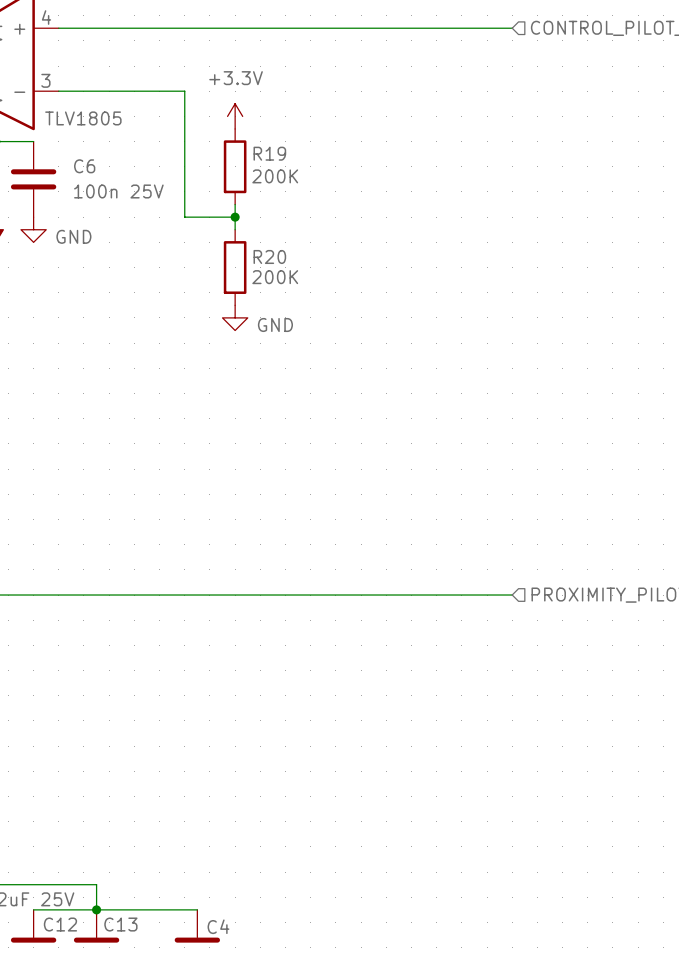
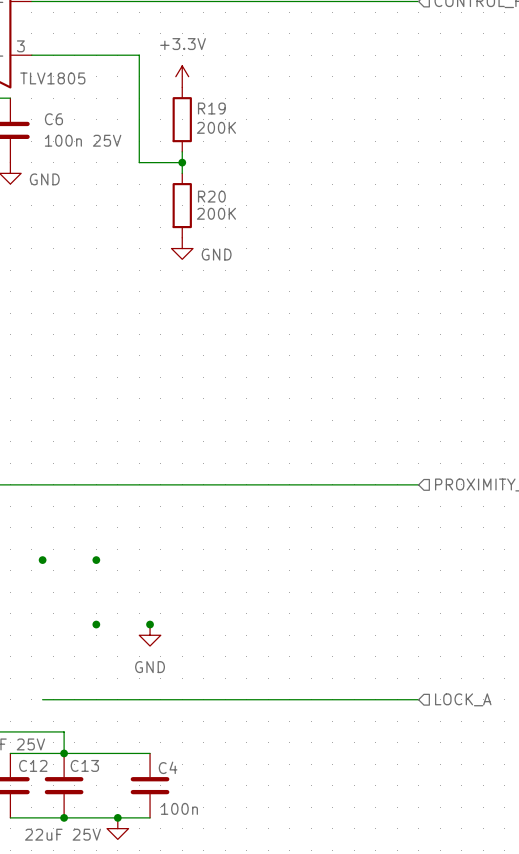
junction: none -> (42, 560)
junction: none -> (96, 560)
junction: none -> (96, 624)
junction: none -> (150, 624)
power symbol: none -> GND (150, 635)
wire: none -> (42, 699) (418, 699)
hierarchical label: none -> LOCK_A (463, 699)

